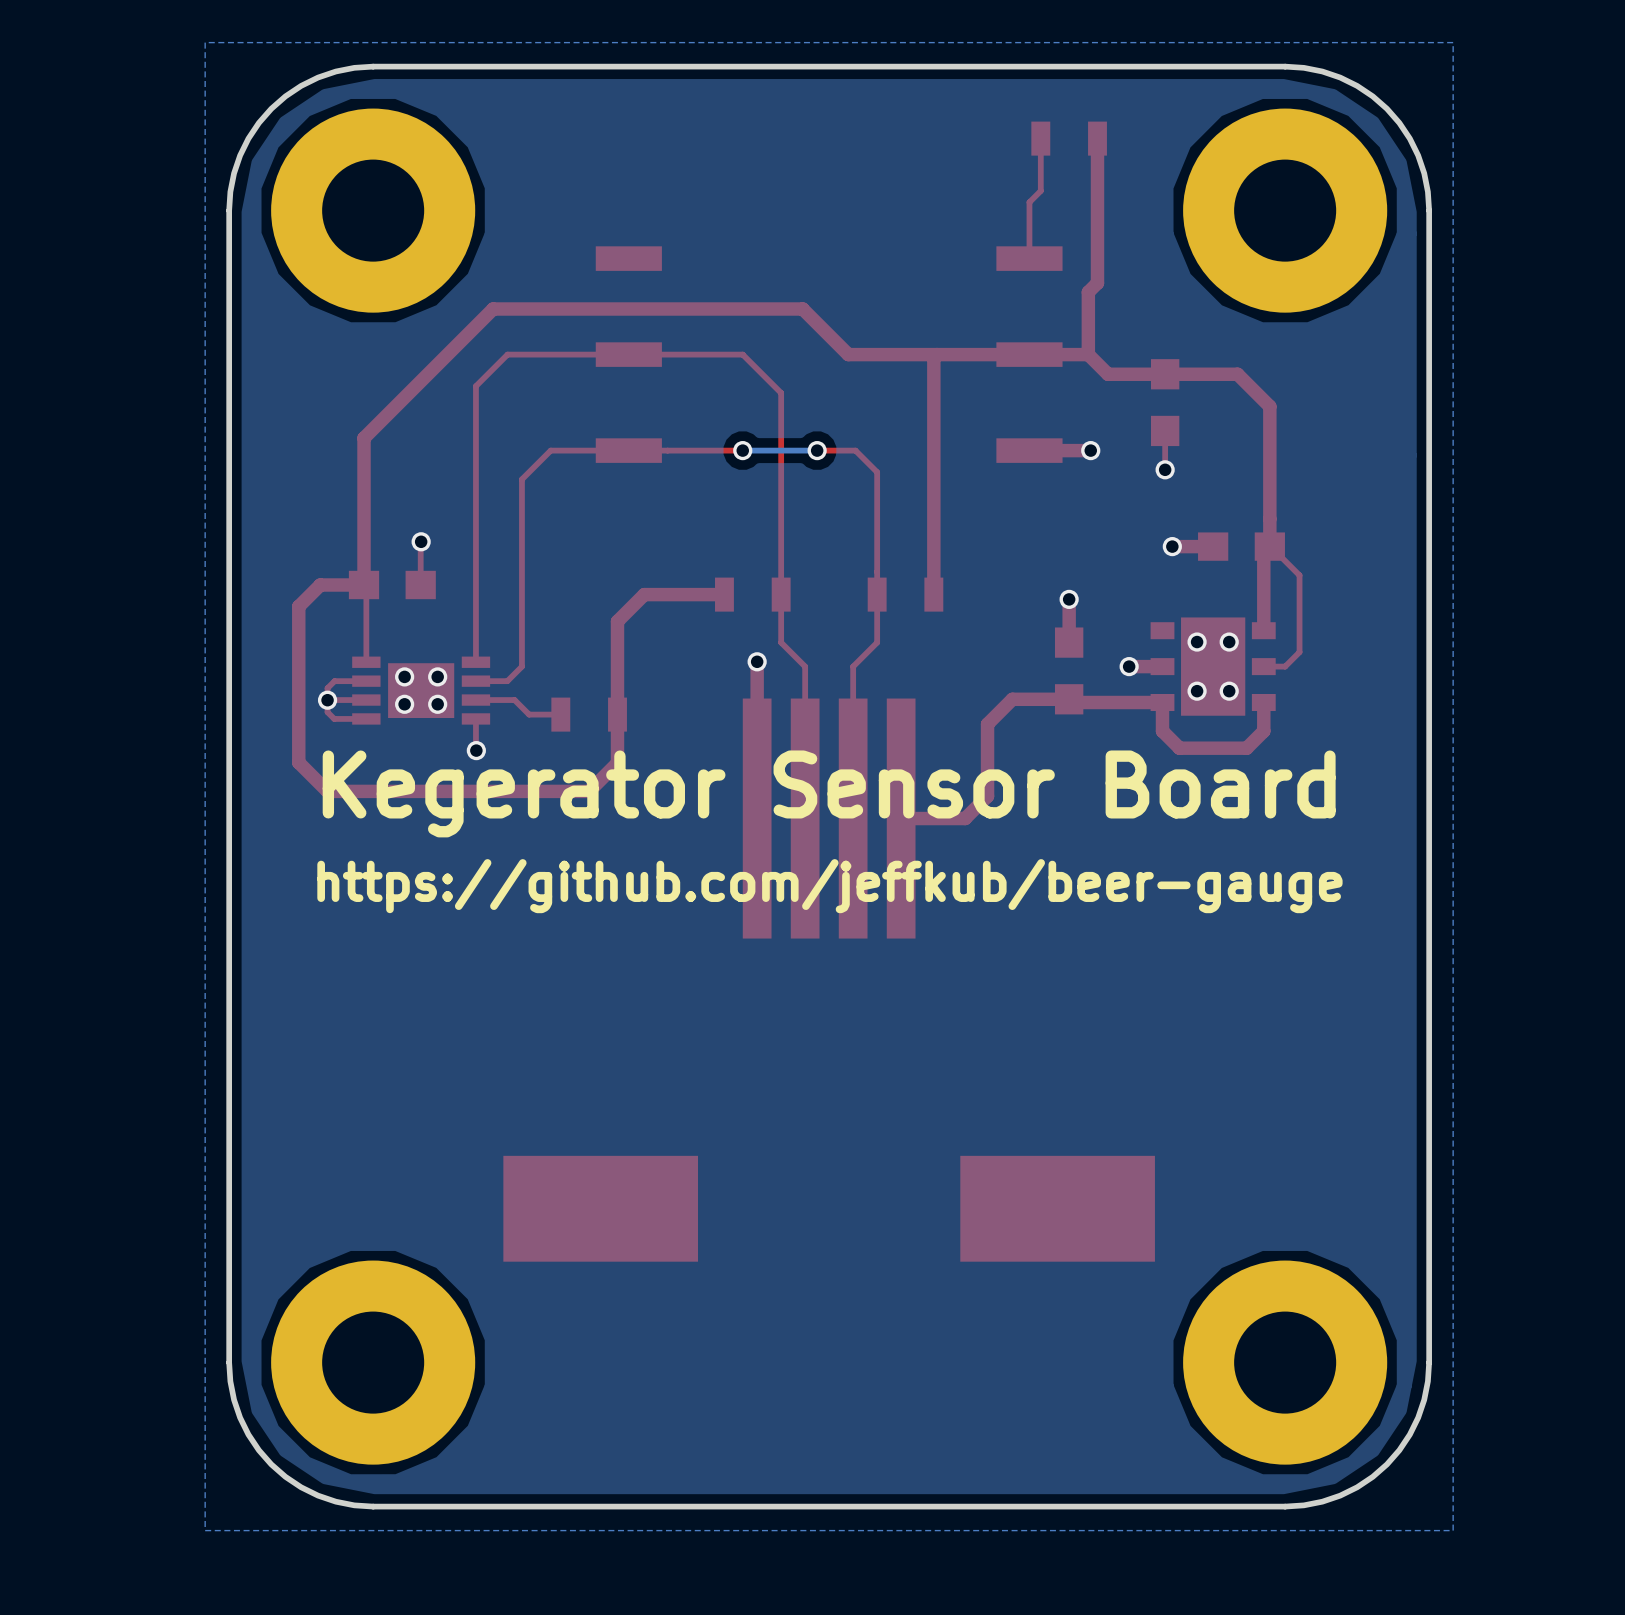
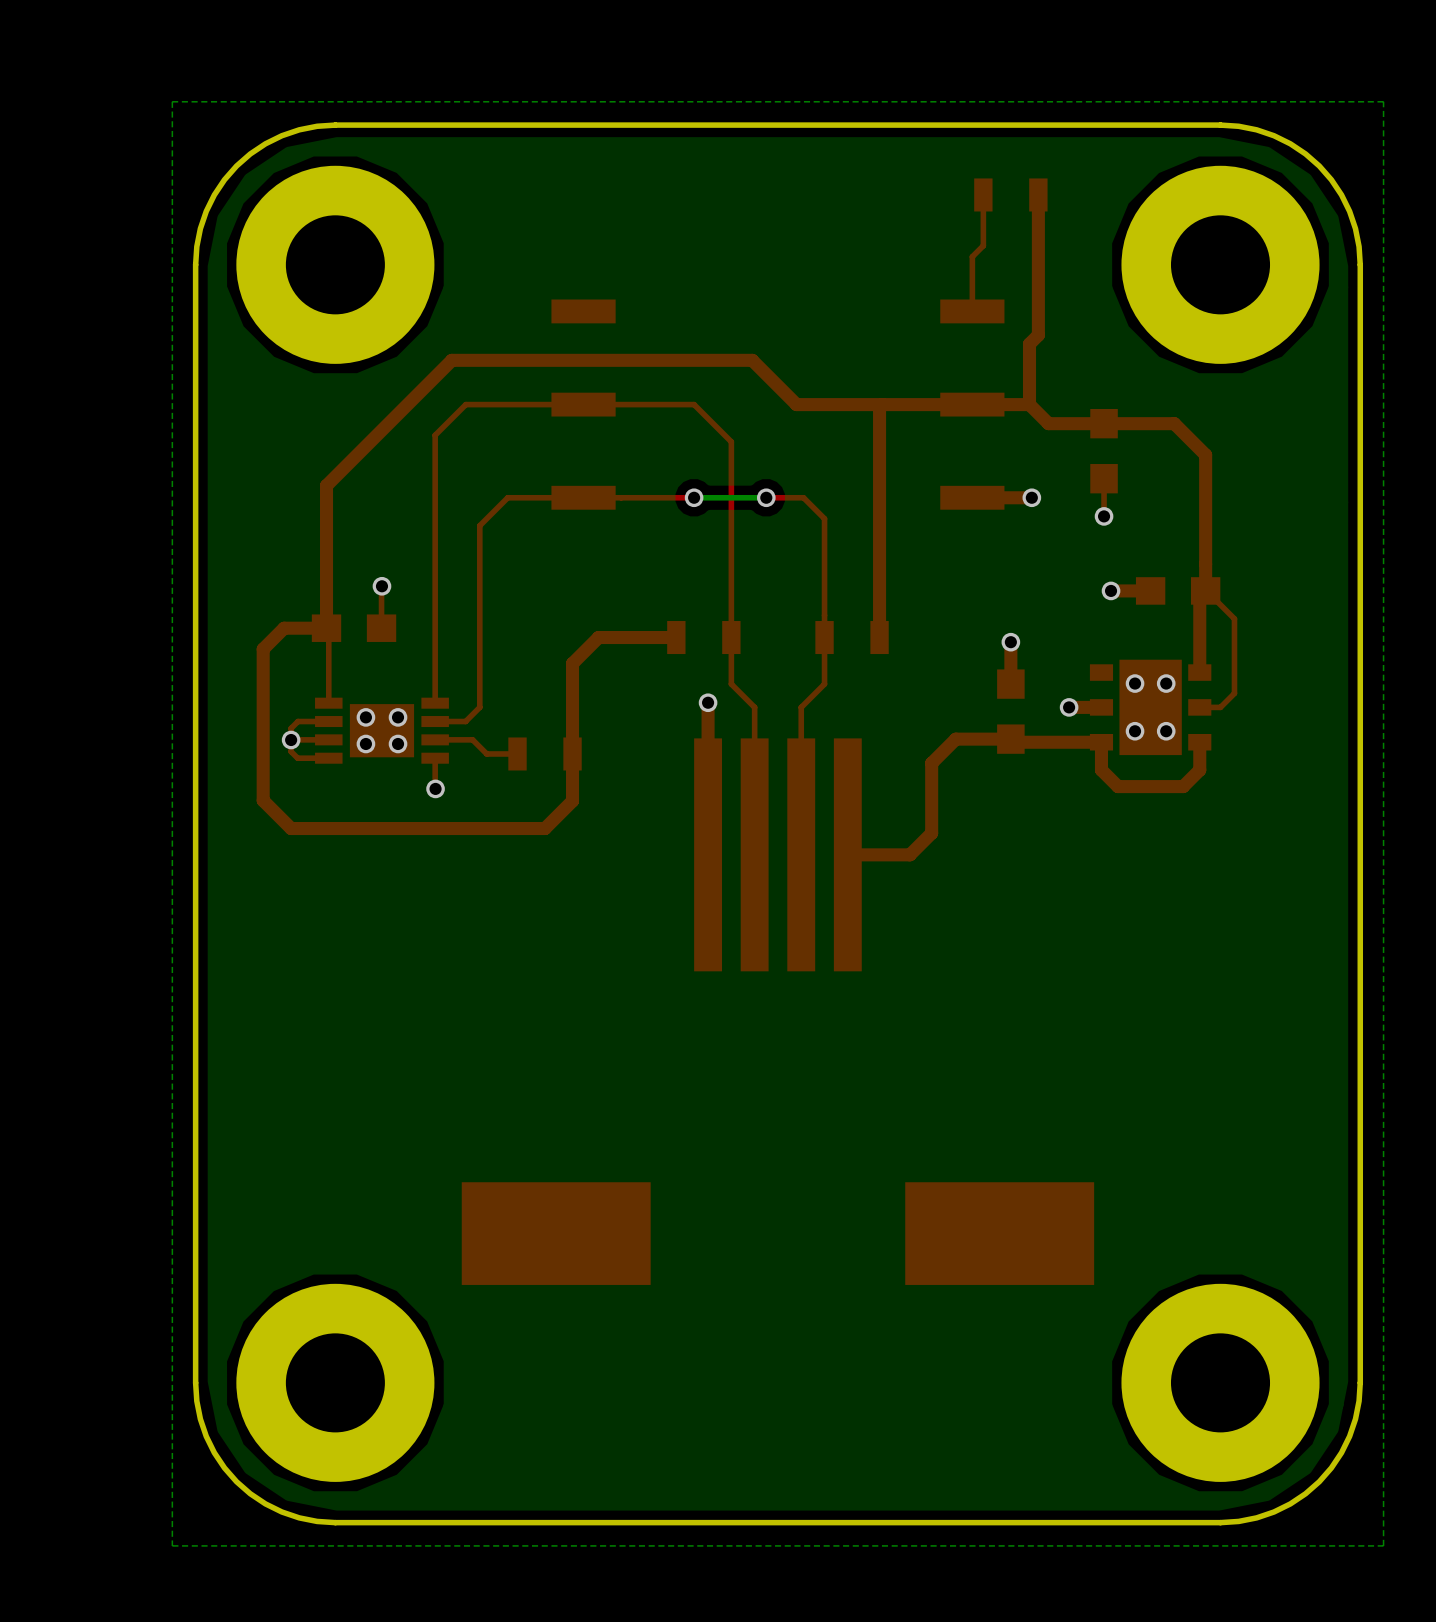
text: Kegerator Sensor Board (829, 793) -> none
text: https://github.com/jeffkub/beer-gauge (829, 886) -> none

